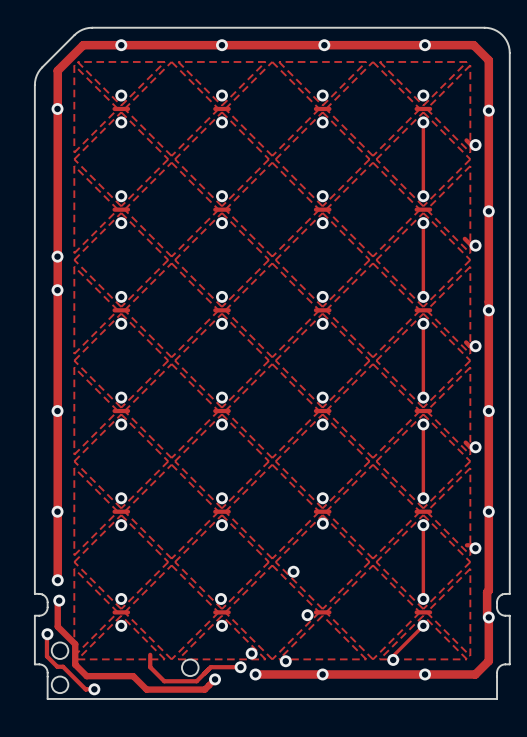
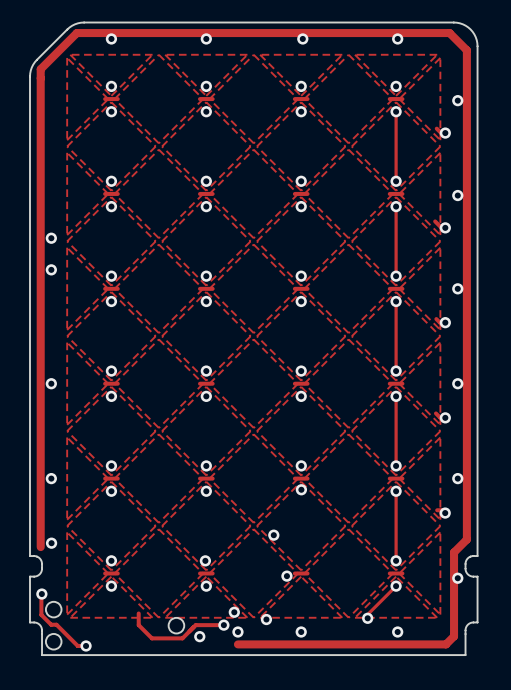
track: none -> (77, 33) (40, 69) (40, 547)
track: none -> (77, 33) (449, 33) (466, 50) (466, 539) (454, 552) (454, 636) (446, 644) (237, 644)
via: (57, 108) -> none
track: (57, 580) (57, 70) (83, 45) (473, 45) (488, 60) (488, 590) (487, 592) (488, 661) (475, 674) (255, 674) -> none
track: (57, 600) (57, 626) (75, 644) (75, 664) (86, 676) (133, 676) (146, 689) (204, 689) (215, 679) -> none
via: (59, 600) -> none

